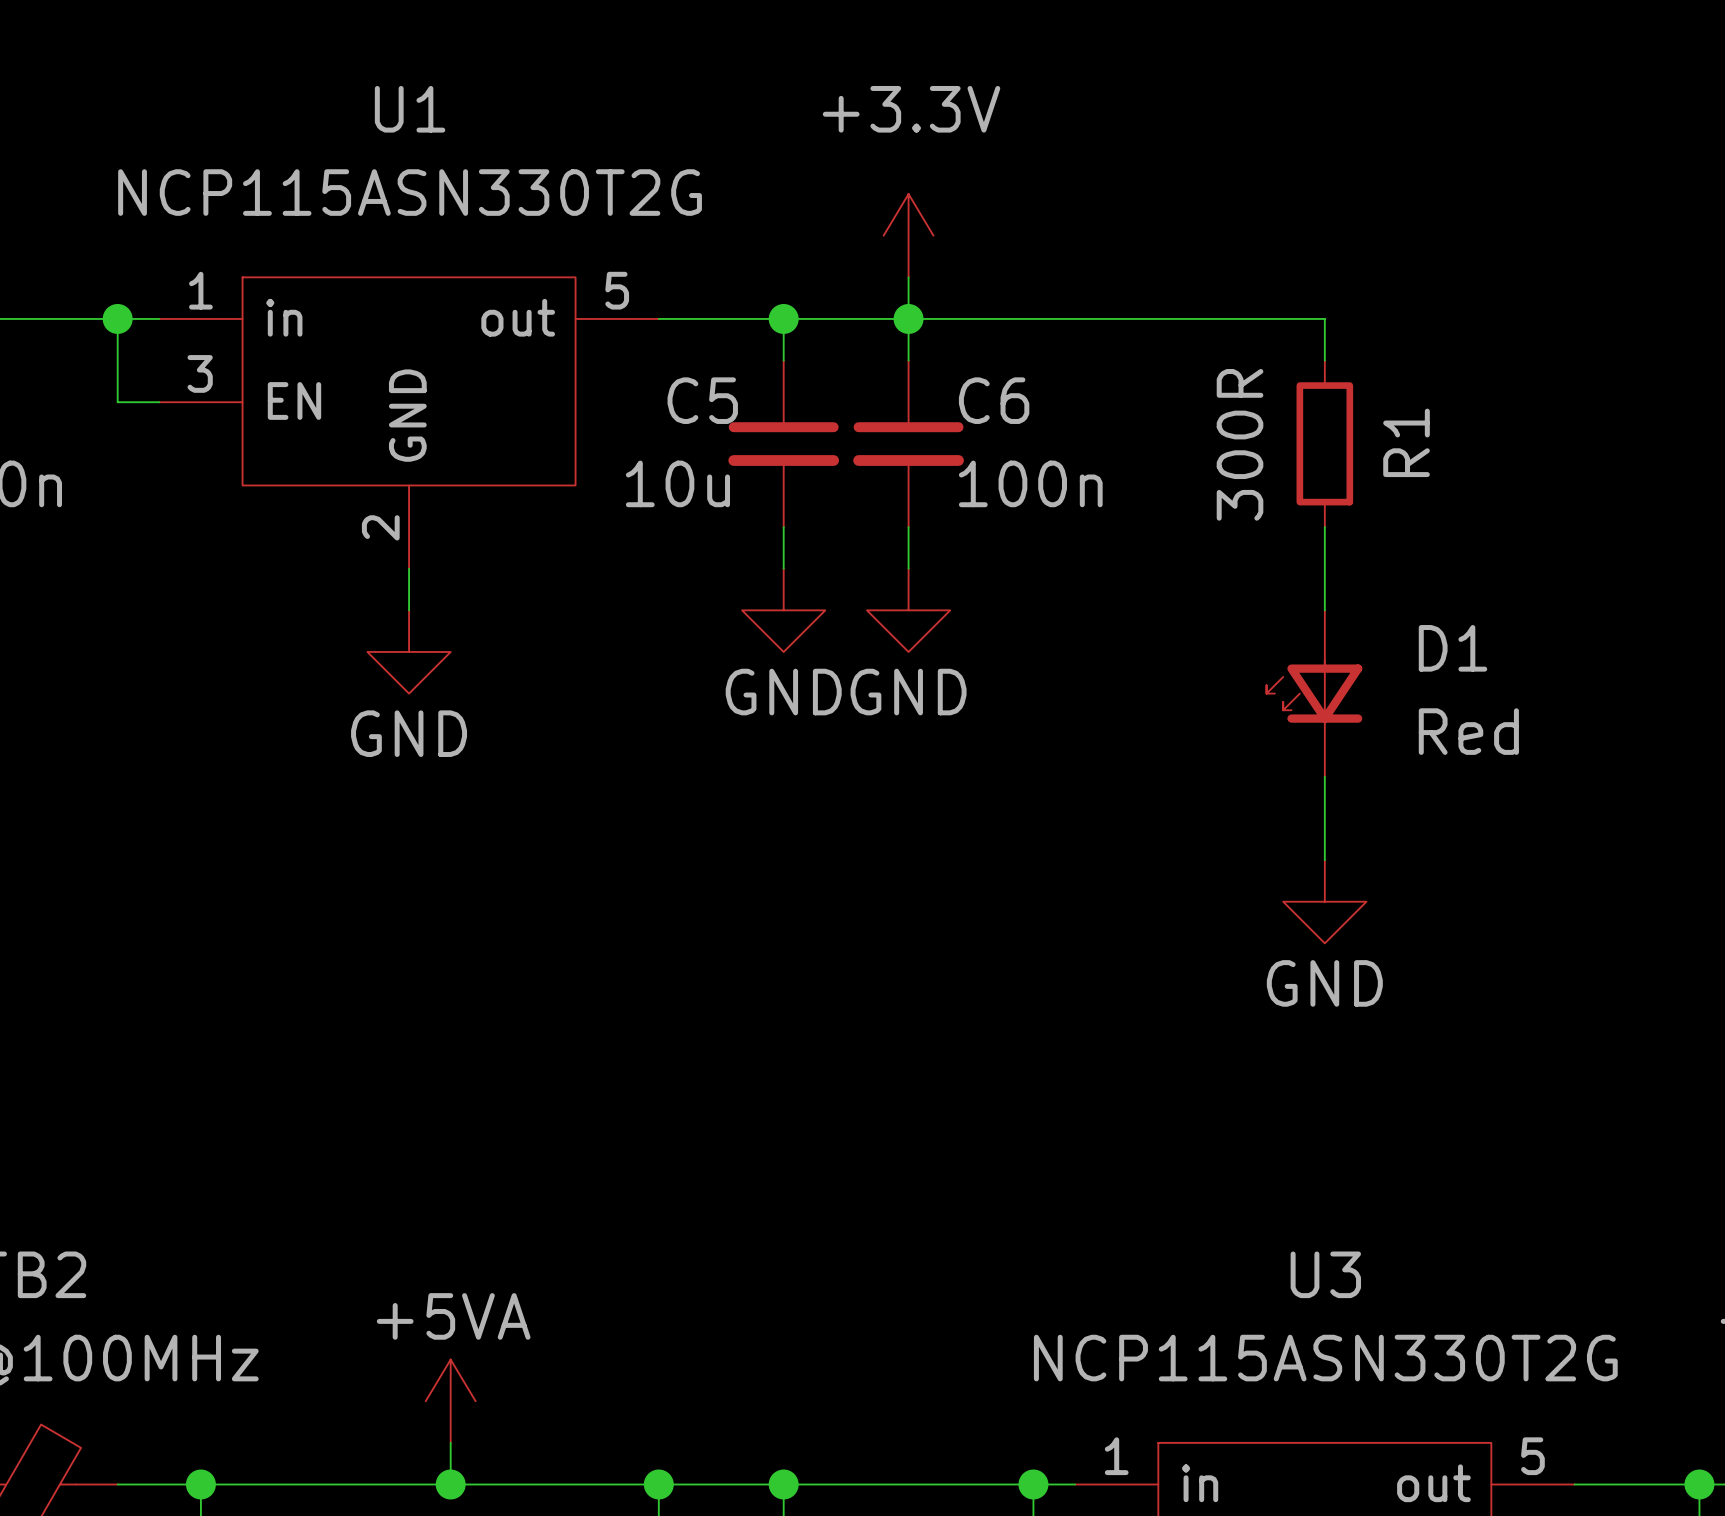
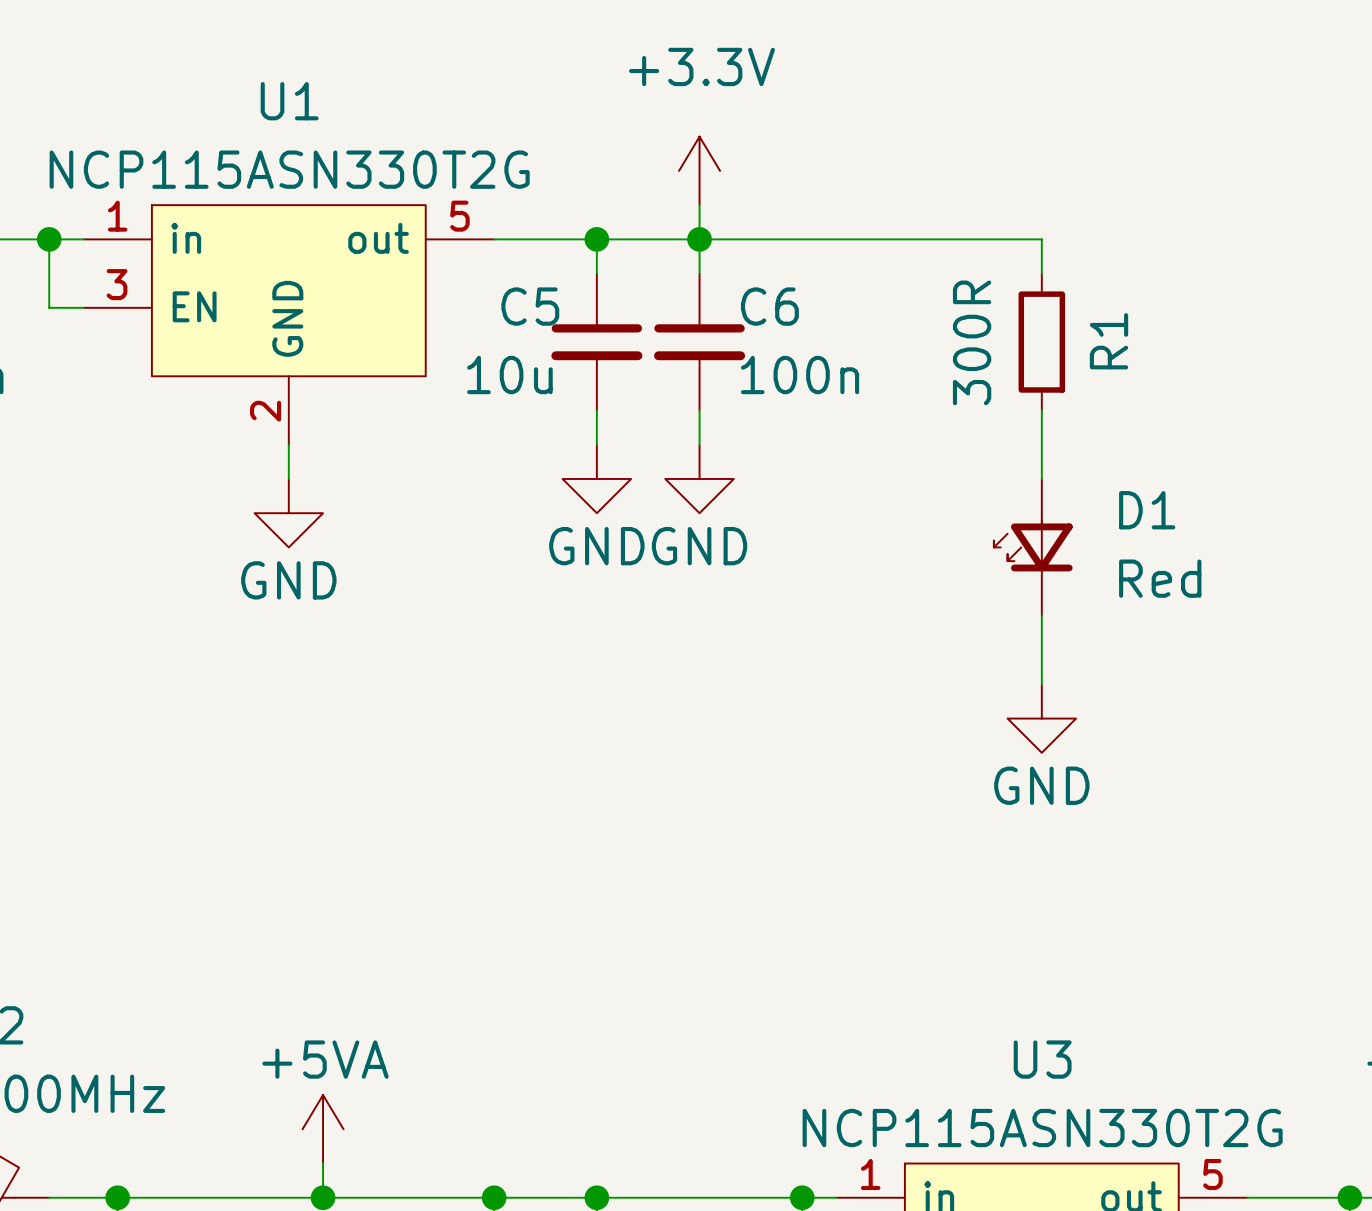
U1 name position: U1 (410, 109) -> U1 (289, 101)
U1 value position: NCP115ASN330T2G (410, 192) -> NCP115ASN330T2G (289, 169)
U3 name position: U3 (1325, 1274) -> U3 (1042, 1059)
U3 value position: NCP115ASN330T2G (1325, 1358) -> NCP115ASN330T2G (1042, 1128)

